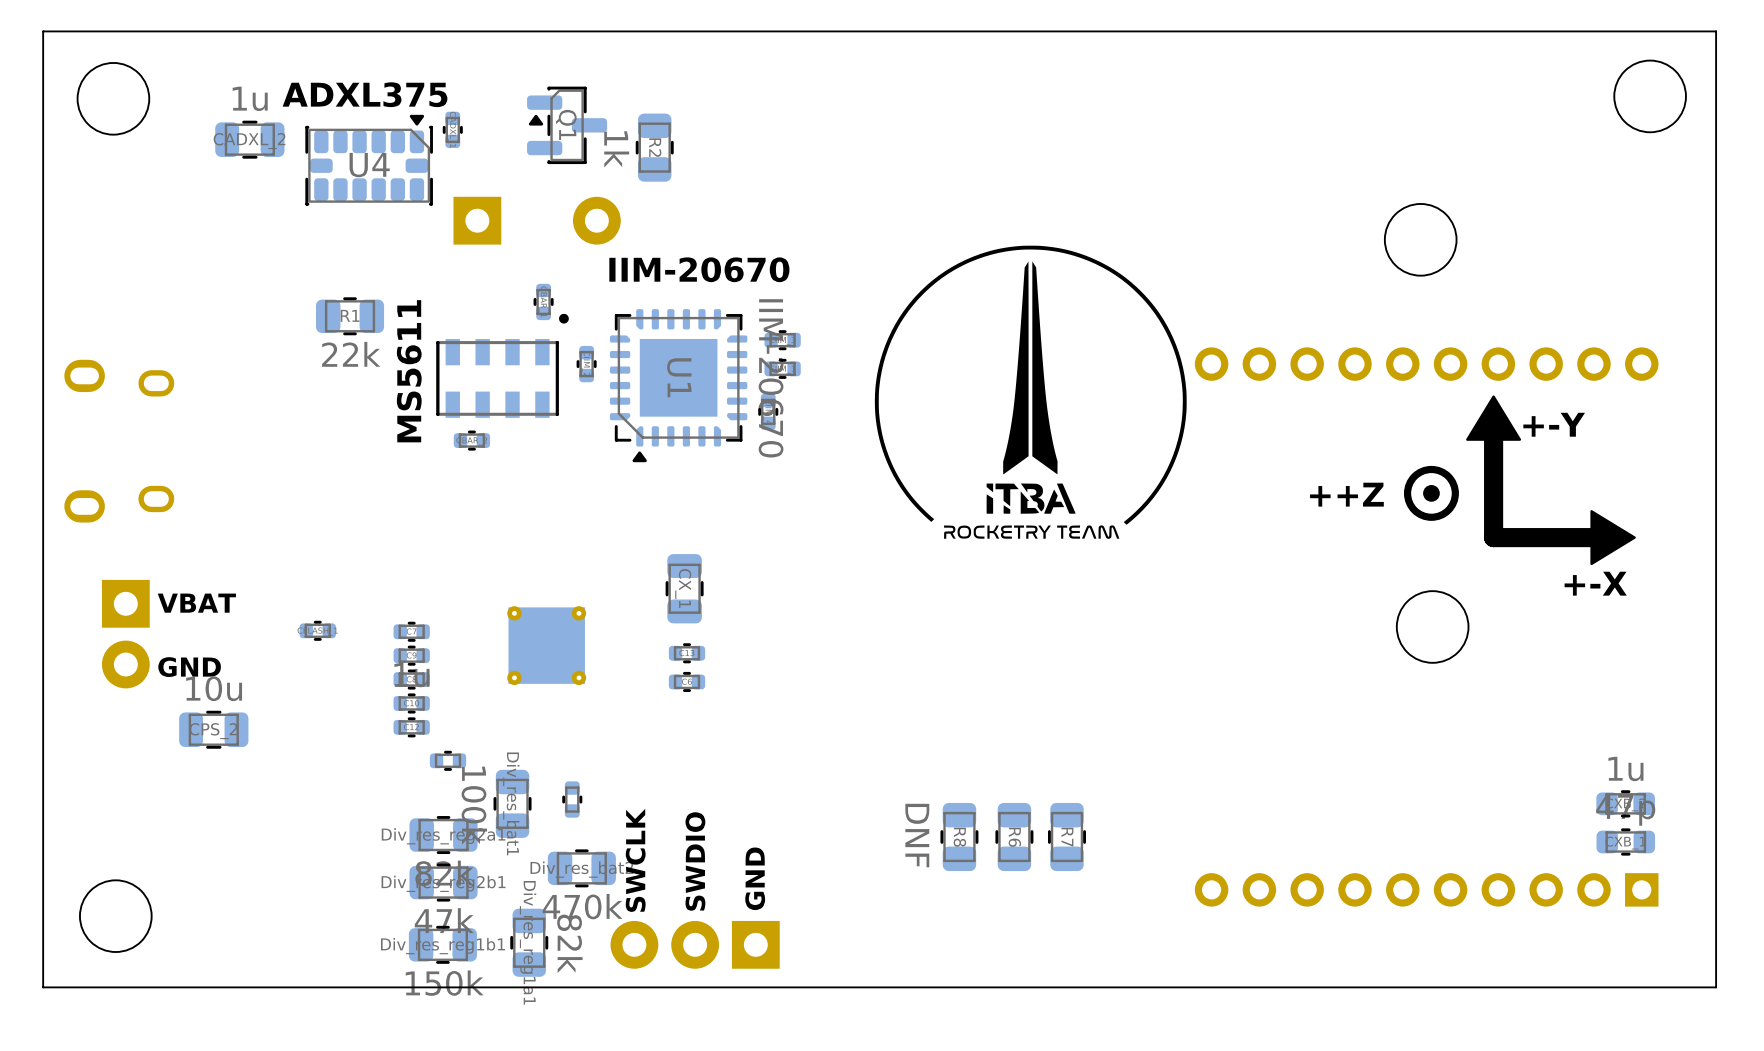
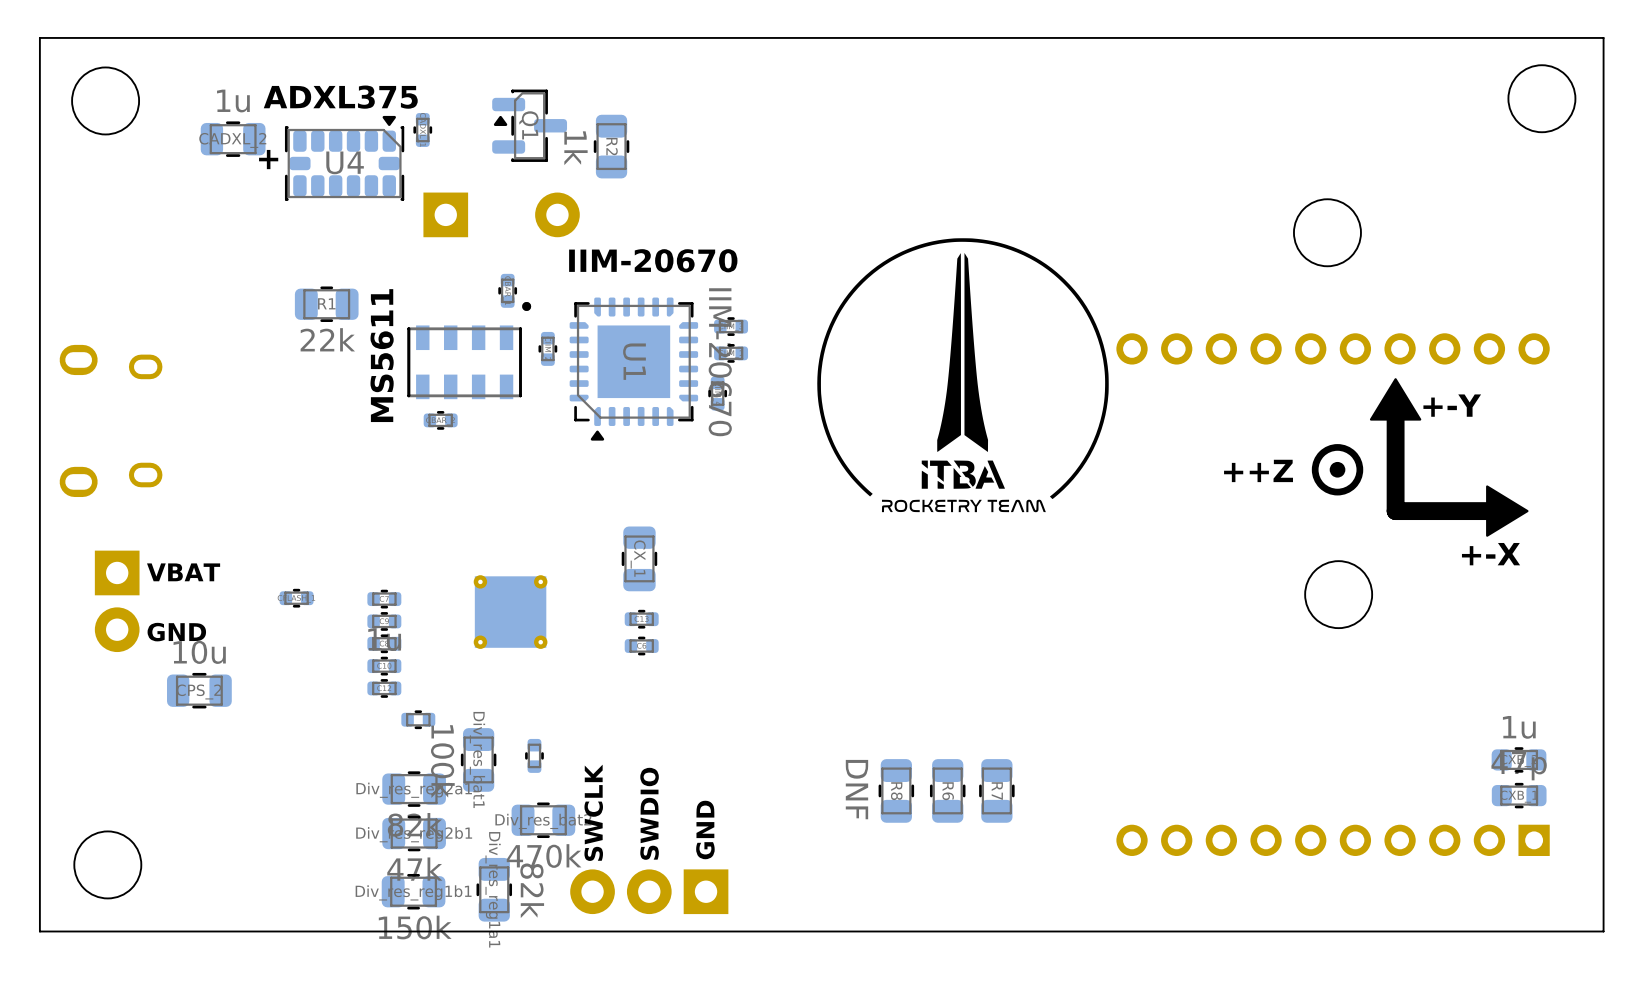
text: none -> + (268, 159)

